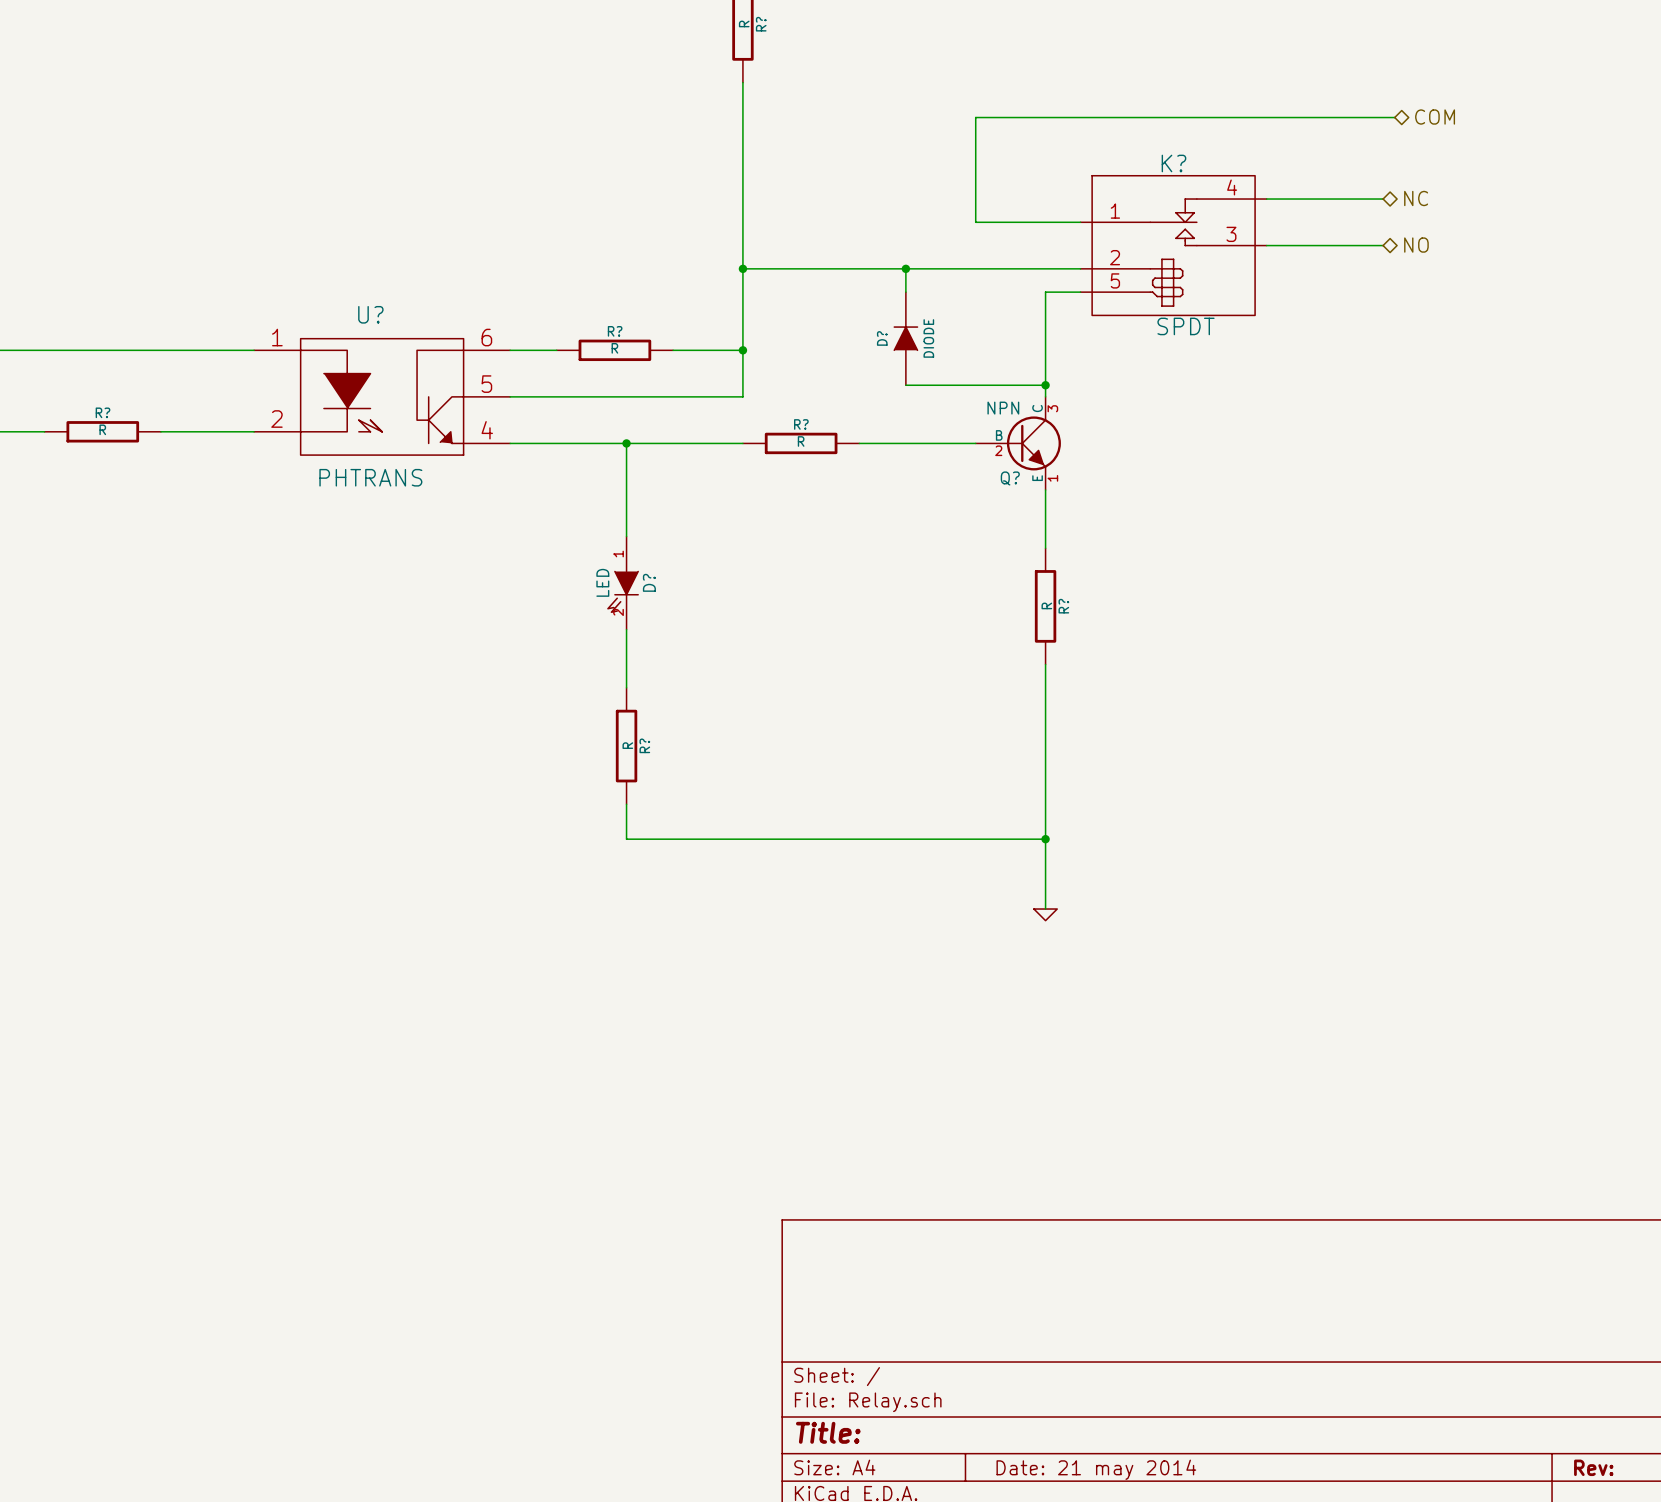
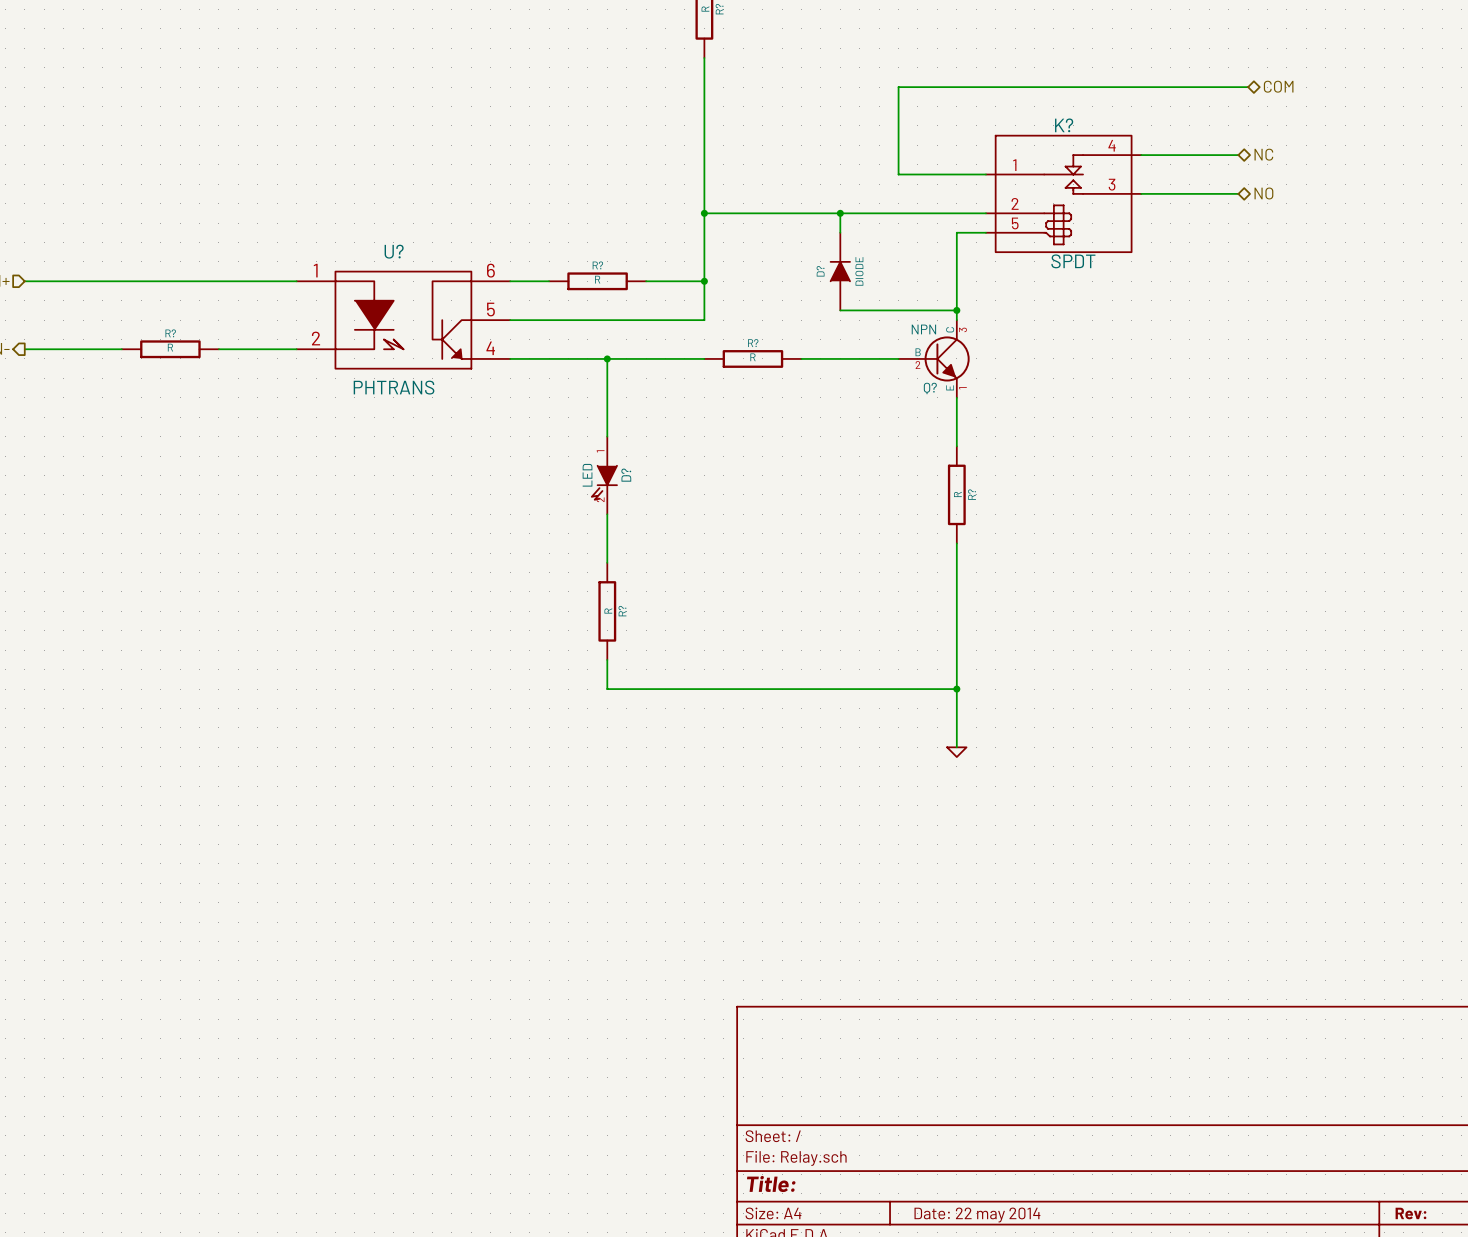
title block: Date: 21 may 2014 (1096, 1469) -> Date: 22 may 2014 (977, 1215)

